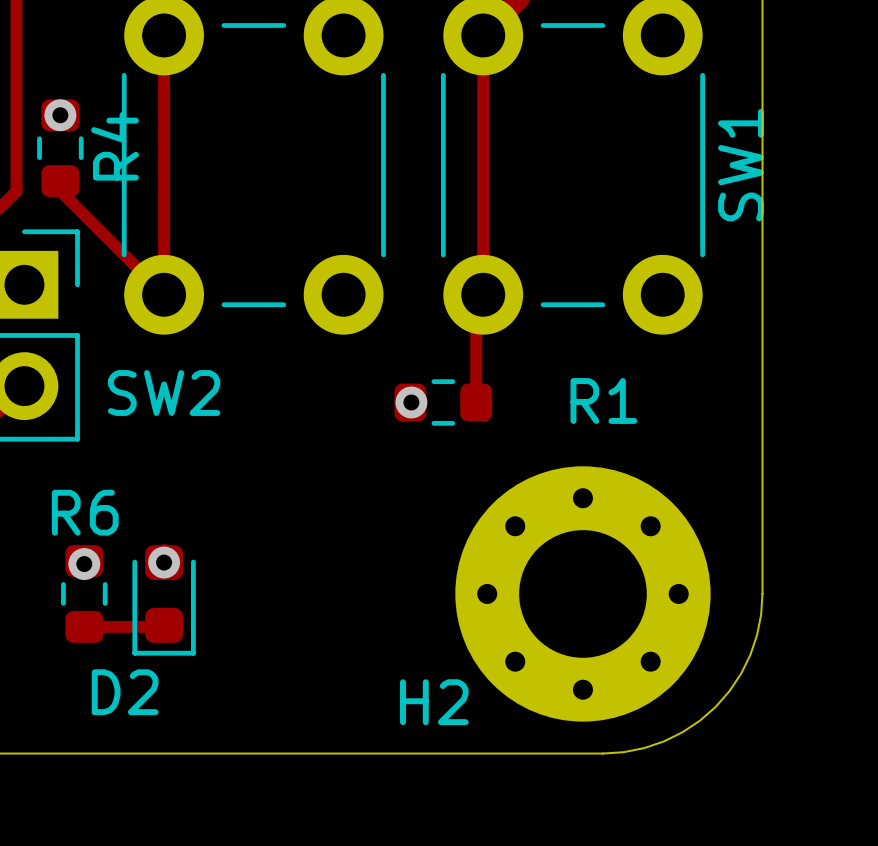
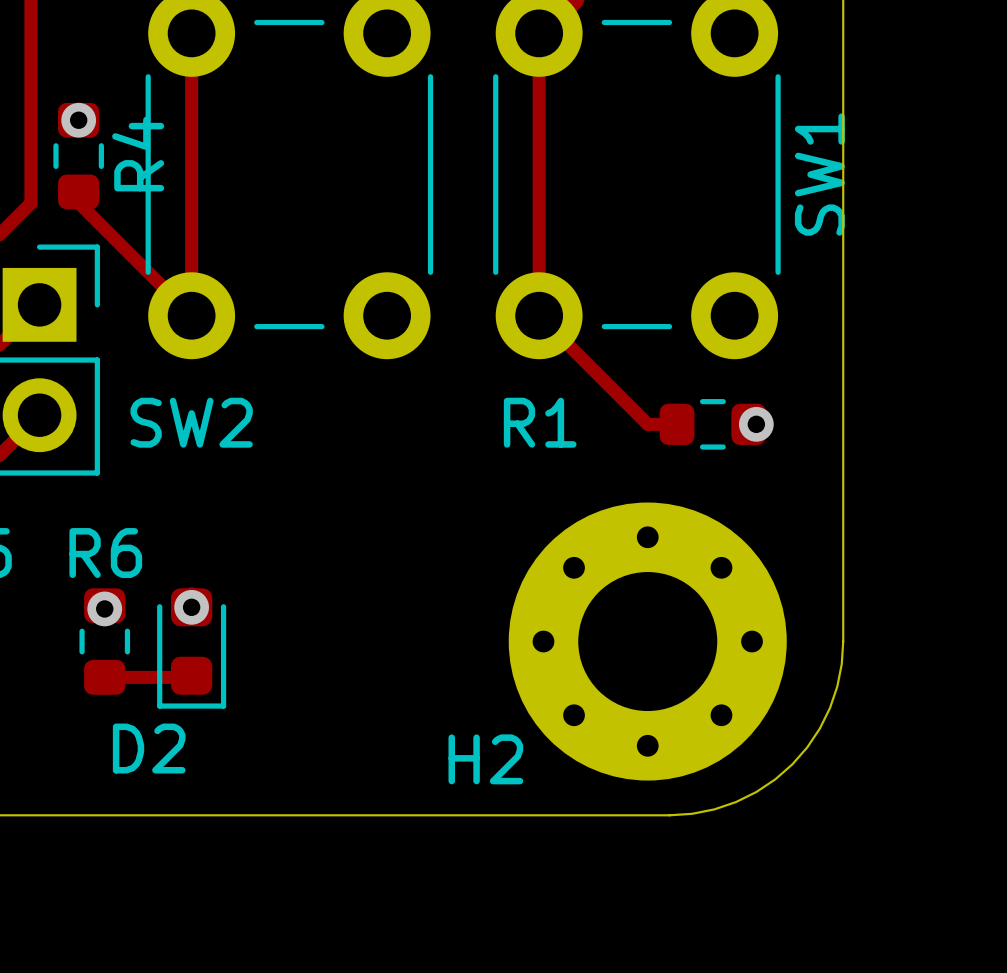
track: (483, 294) (476, 301) (476, 402) -> (539, 315) (647, 424) (677, 424)
via: none -> (756, 424)
R1 name position: R1 (603, 400) -> R1 (540, 422)
via: (411, 402) -> none
R1 position: (443, 402) -> (712, 424)

